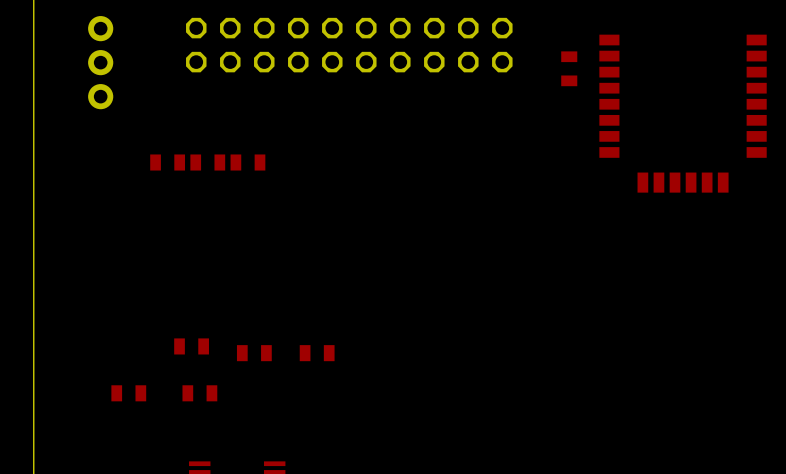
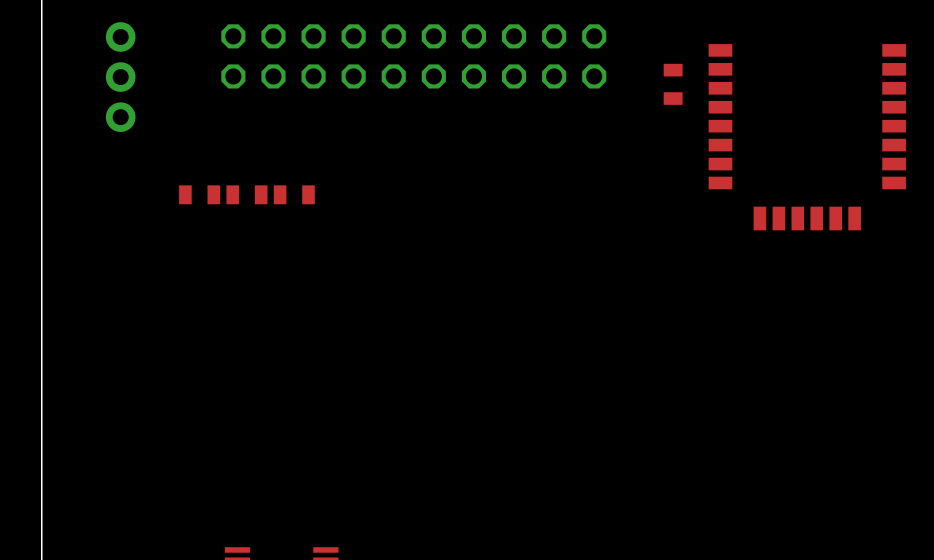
part: (191, 346) -> none
part: (254, 353) -> none
part: (317, 353) -> none
part: (128, 393) -> none
part: (199, 393) -> none

